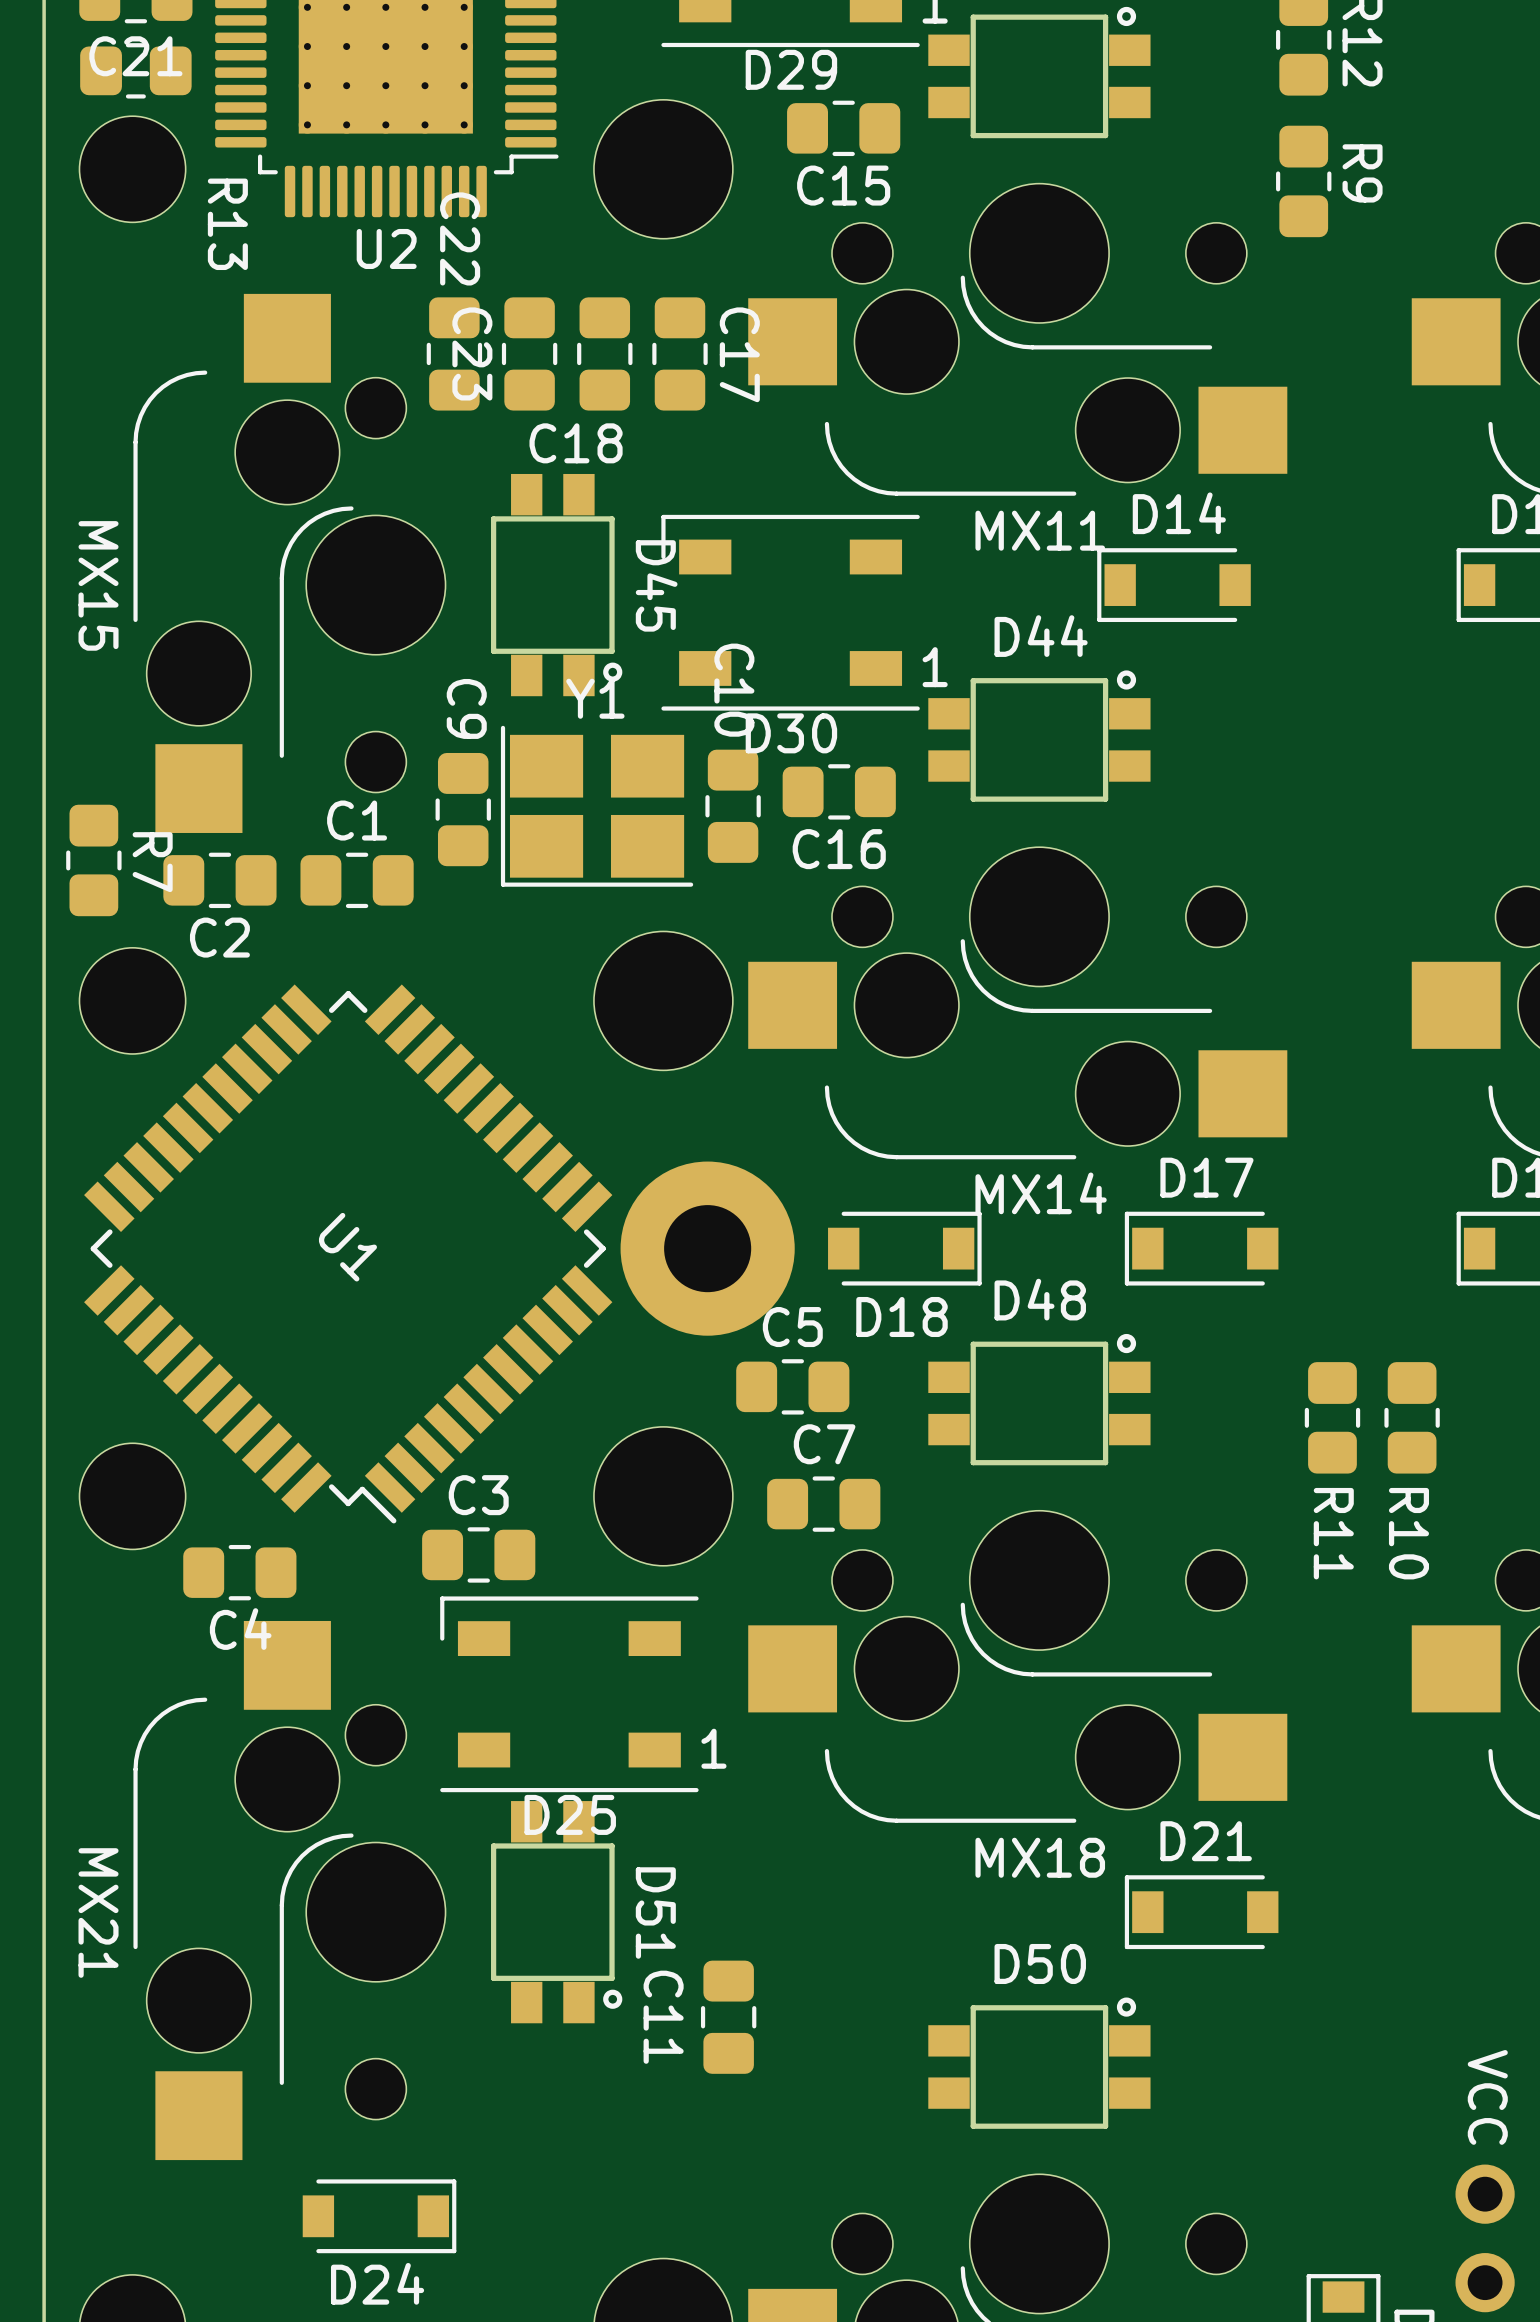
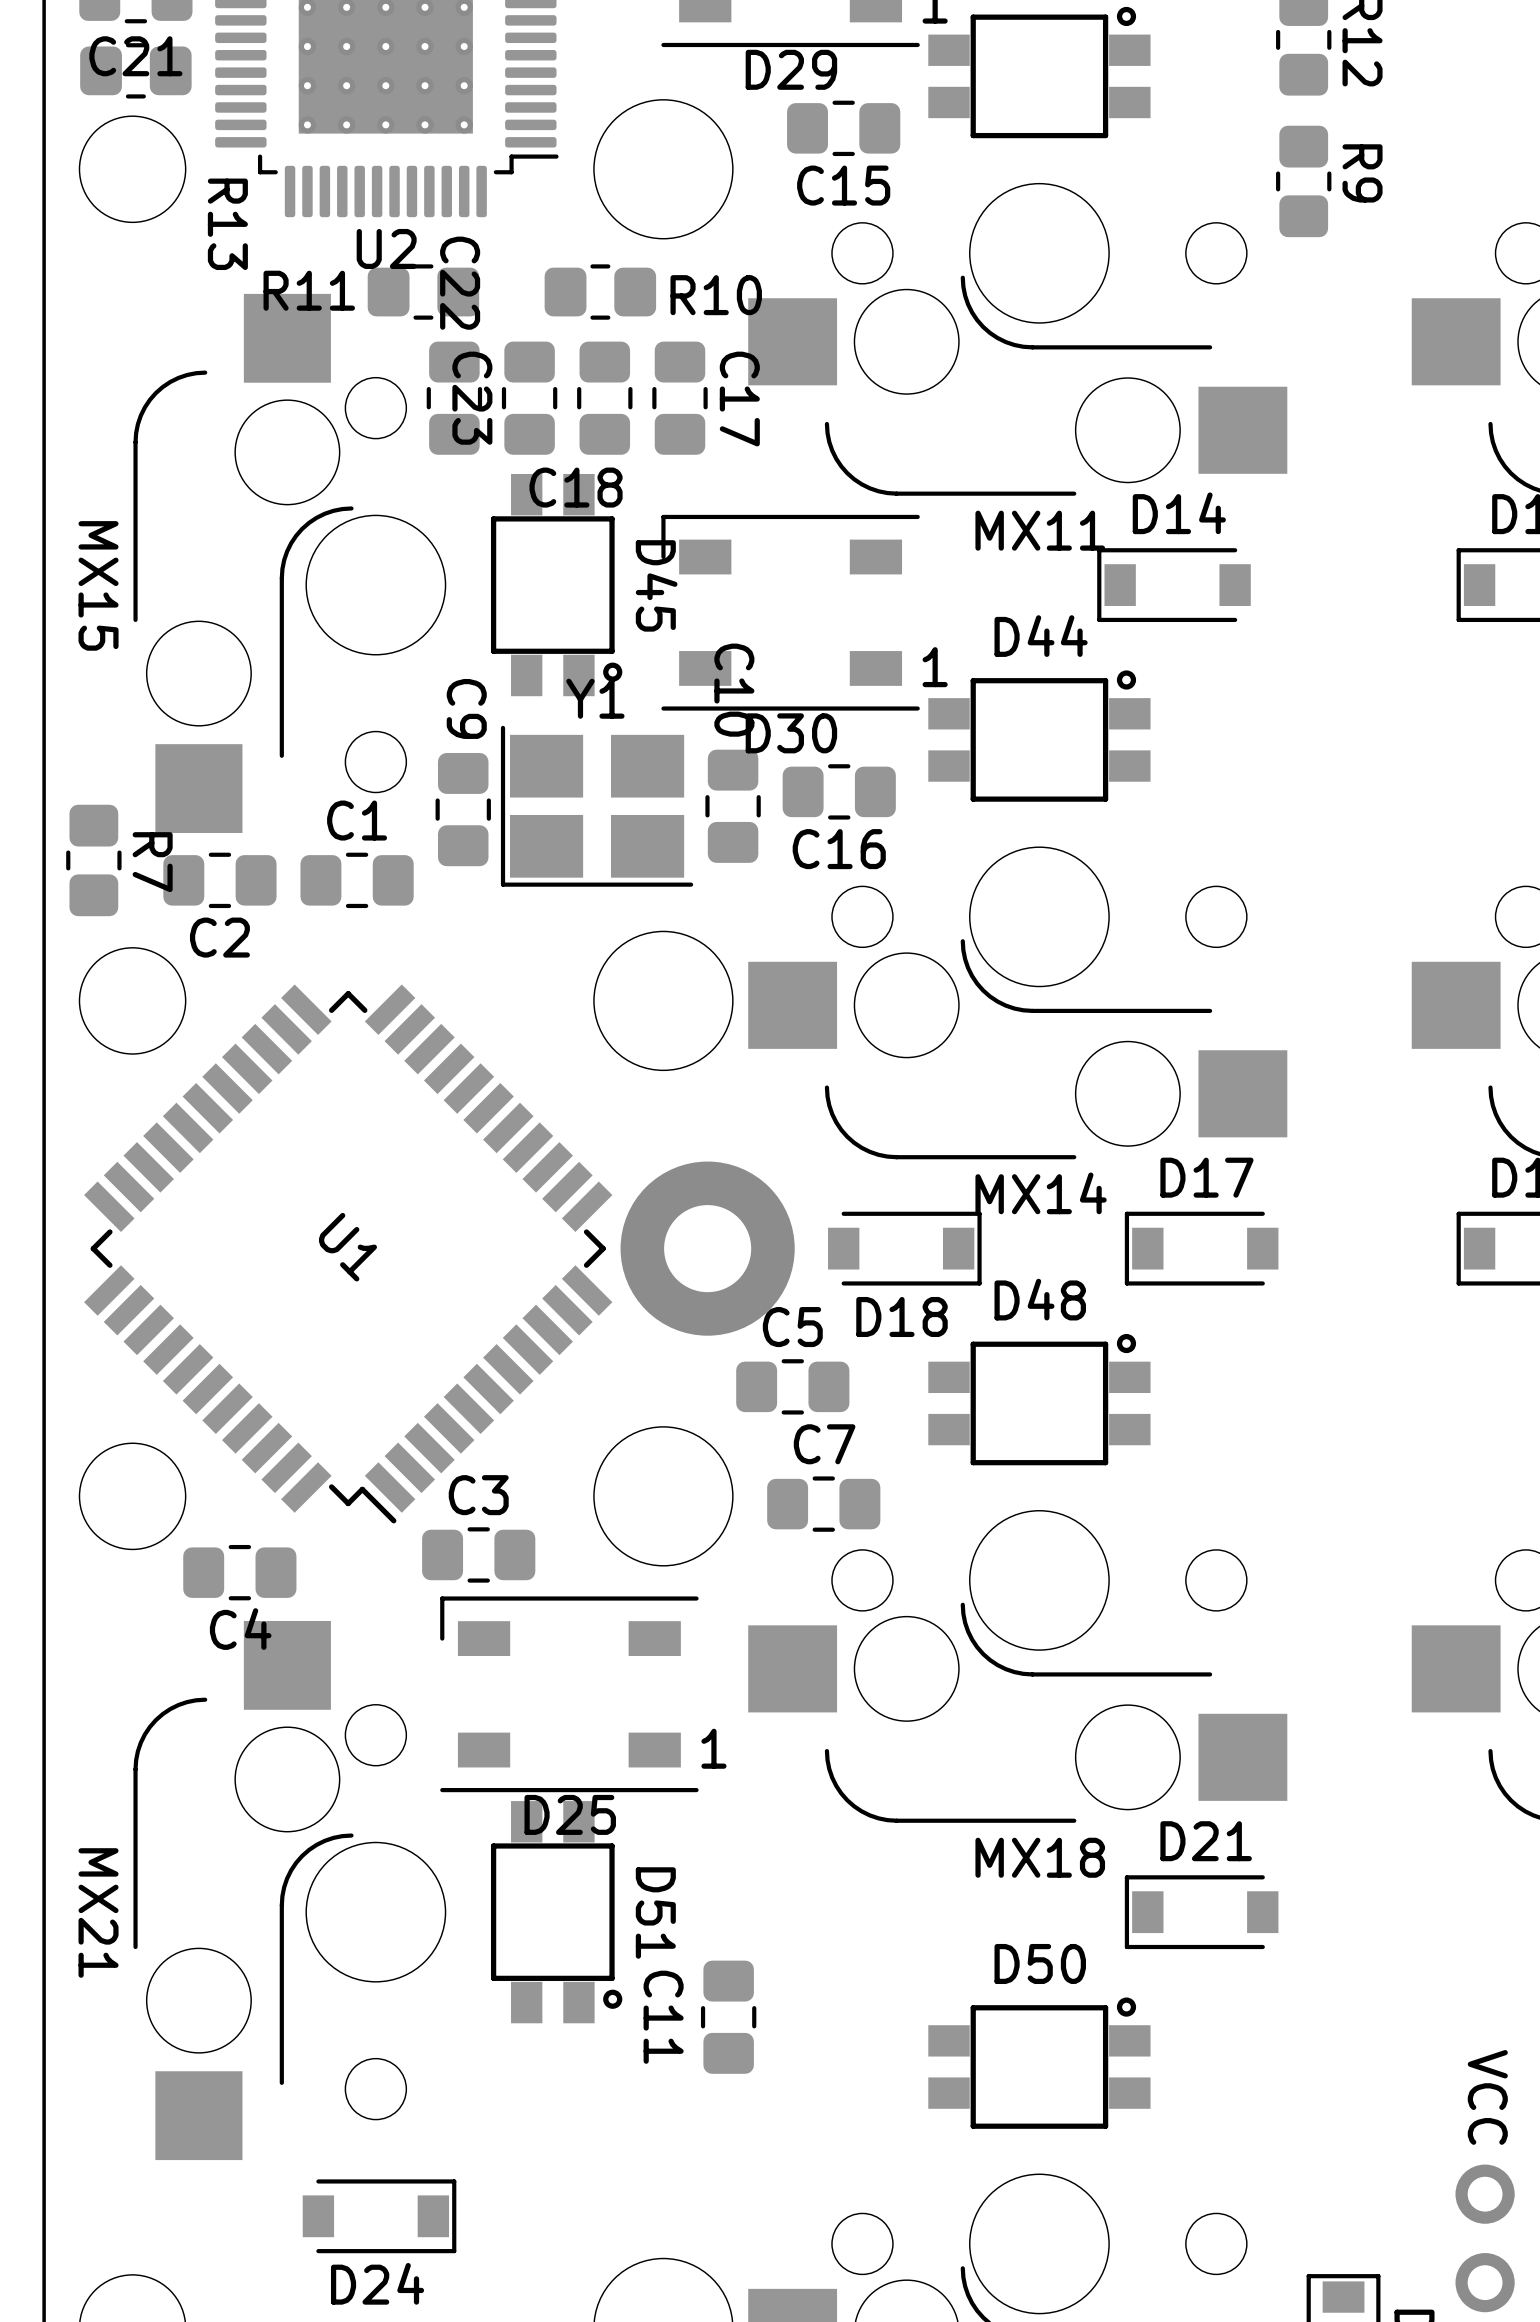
C22 position: (454, 353) -> (454, 398)
C23 position: (529, 353) -> (529, 398)
C18 position: (604, 353) -> (604, 398)
C17 position: (679, 353) -> (679, 398)
R11 rotation: 0° (1332, 1417) -> 90° clockwise (423, 292)
R11 position: (1332, 1417) -> (423, 292)
R10 rotation: 0° (1412, 1417) -> 90° clockwise (600, 292)
R10 position: (1412, 1417) -> (600, 292)
R10 name position: R10 (1408, 1533) -> R10 (716, 295)

